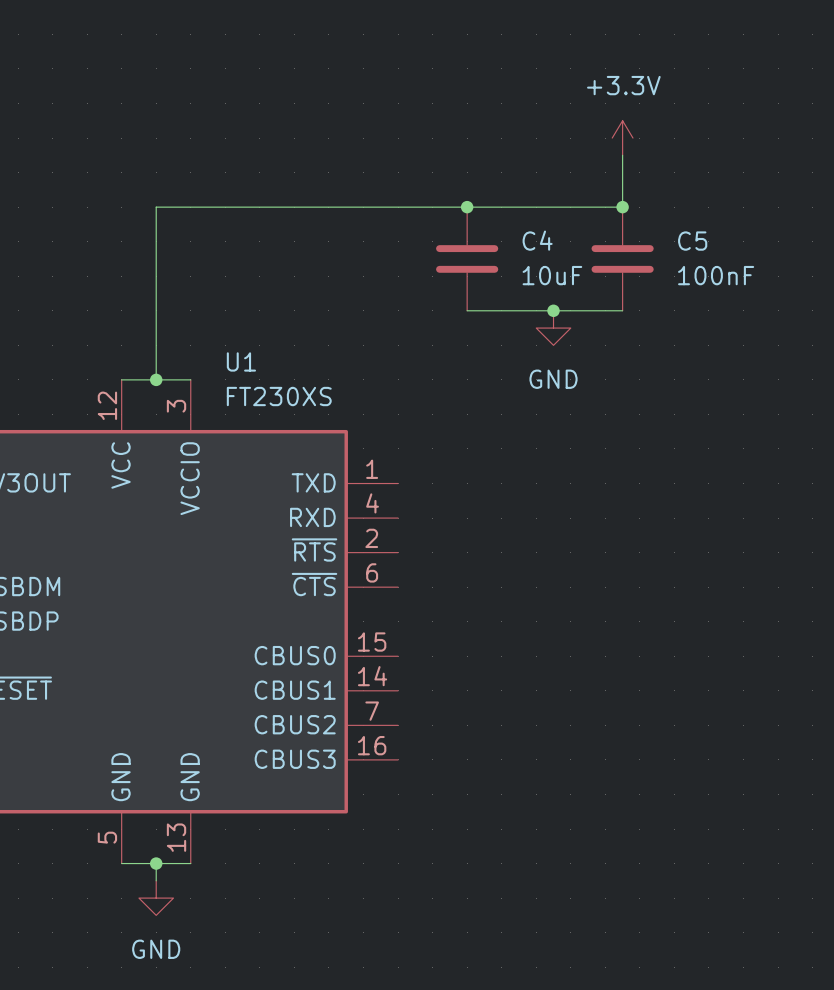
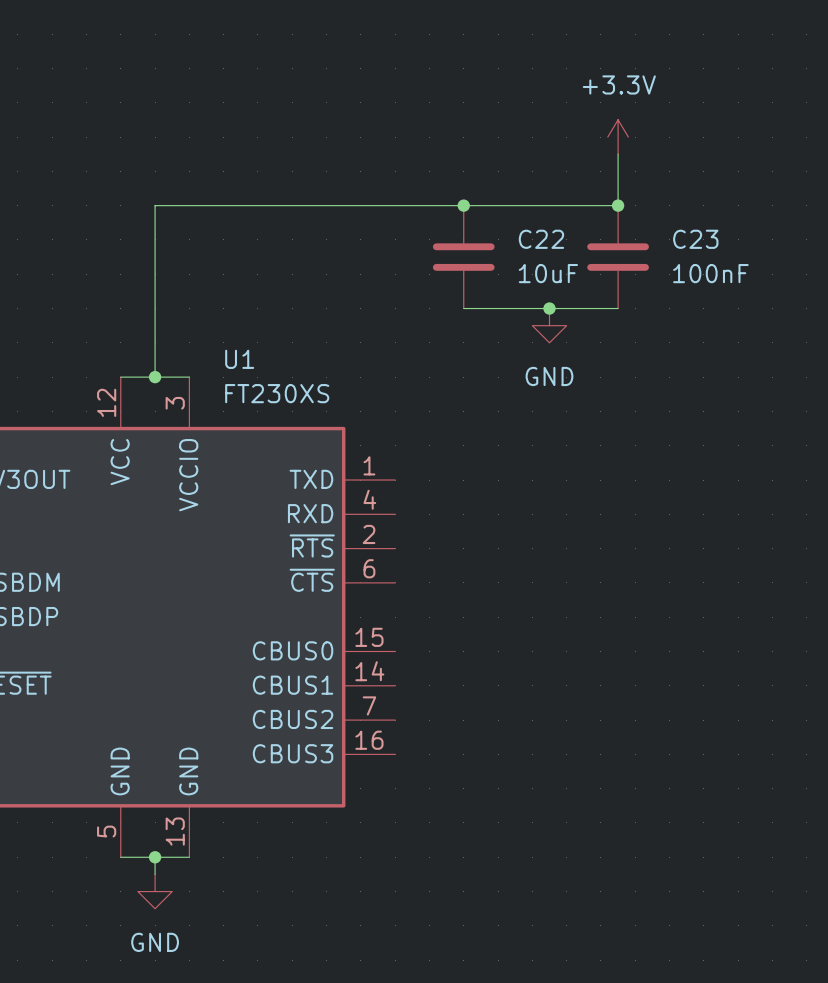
C4 name: C4 (537, 240) -> C22 (541, 239)
C5 name: C5 (692, 241) -> C23 (695, 239)

